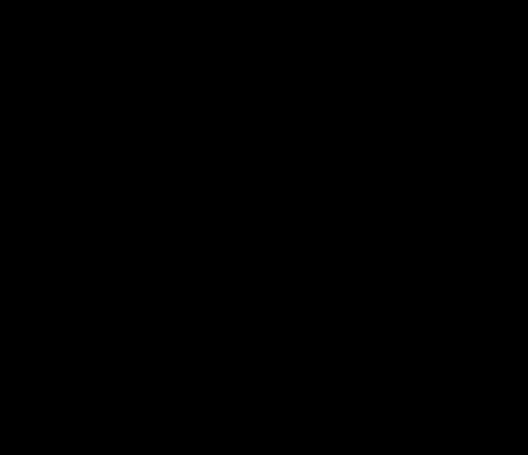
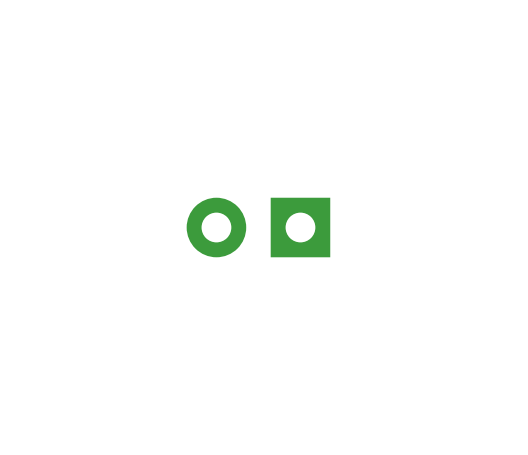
part: none -> (258, 227)

